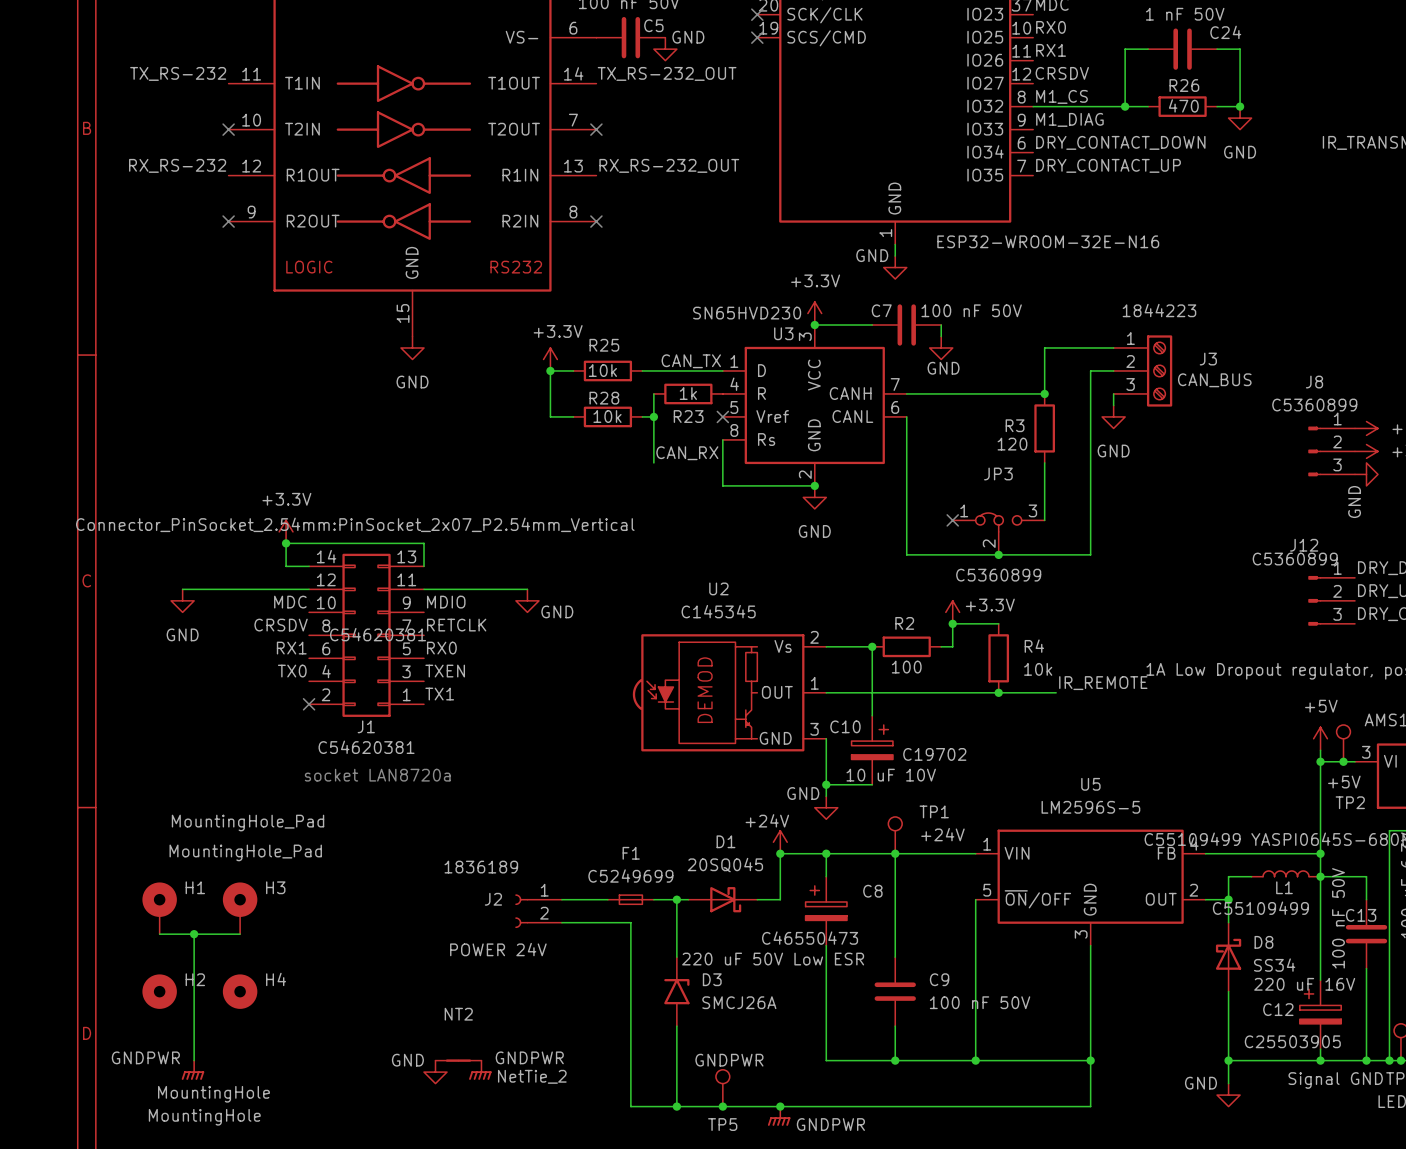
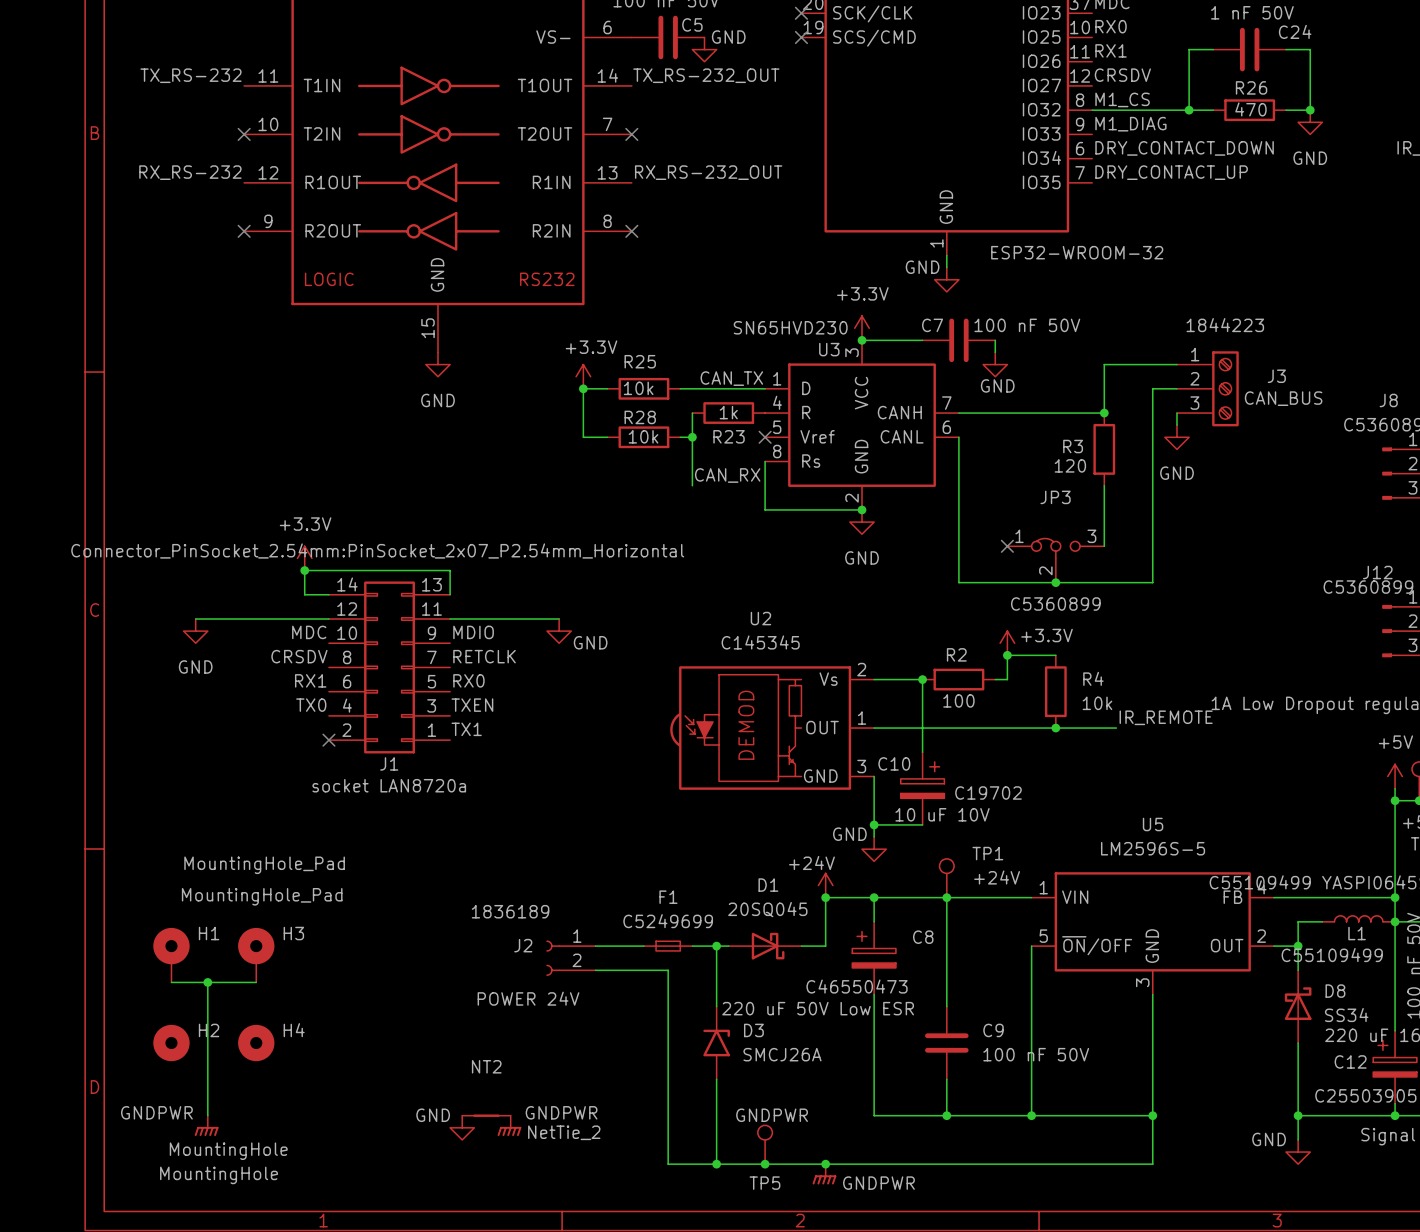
part value: ESP32-WROOM-32E-N16 (1048, 241) -> ESP32-WROOM-32 (1077, 252)
J1 text: Connector_PinSocket_2.54mm:PinSocket_2x07_P2.54mm_Vertical (355, 524) -> Connector_PinSocket_2.54mm:PinSocket_2x07_P2.54mm_Horizontal (377, 550)
J1 text: C54620381 (378, 634) -> none
J1 value: C54620381 (366, 747) -> socket LAN8720a (389, 785)
text: socket LAN8720a (377, 775) -> none

